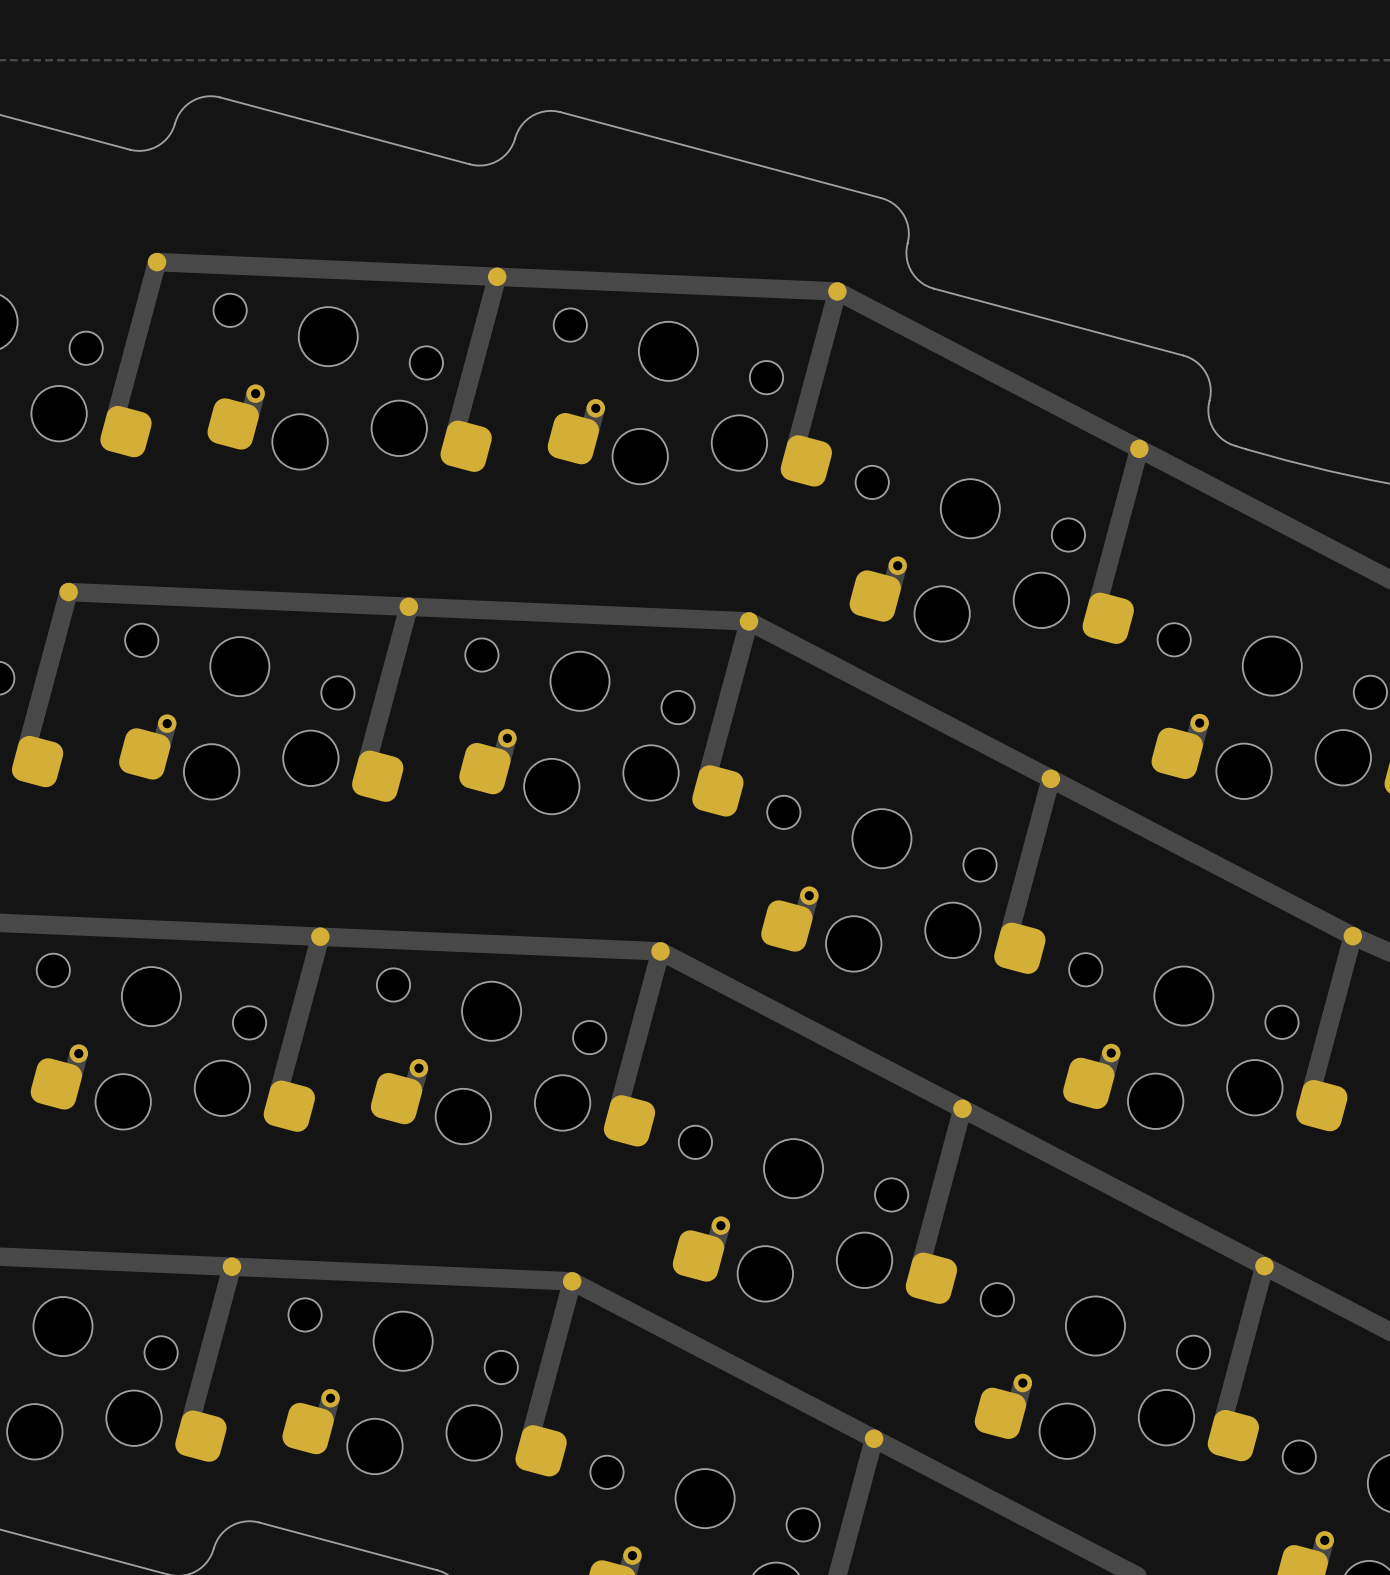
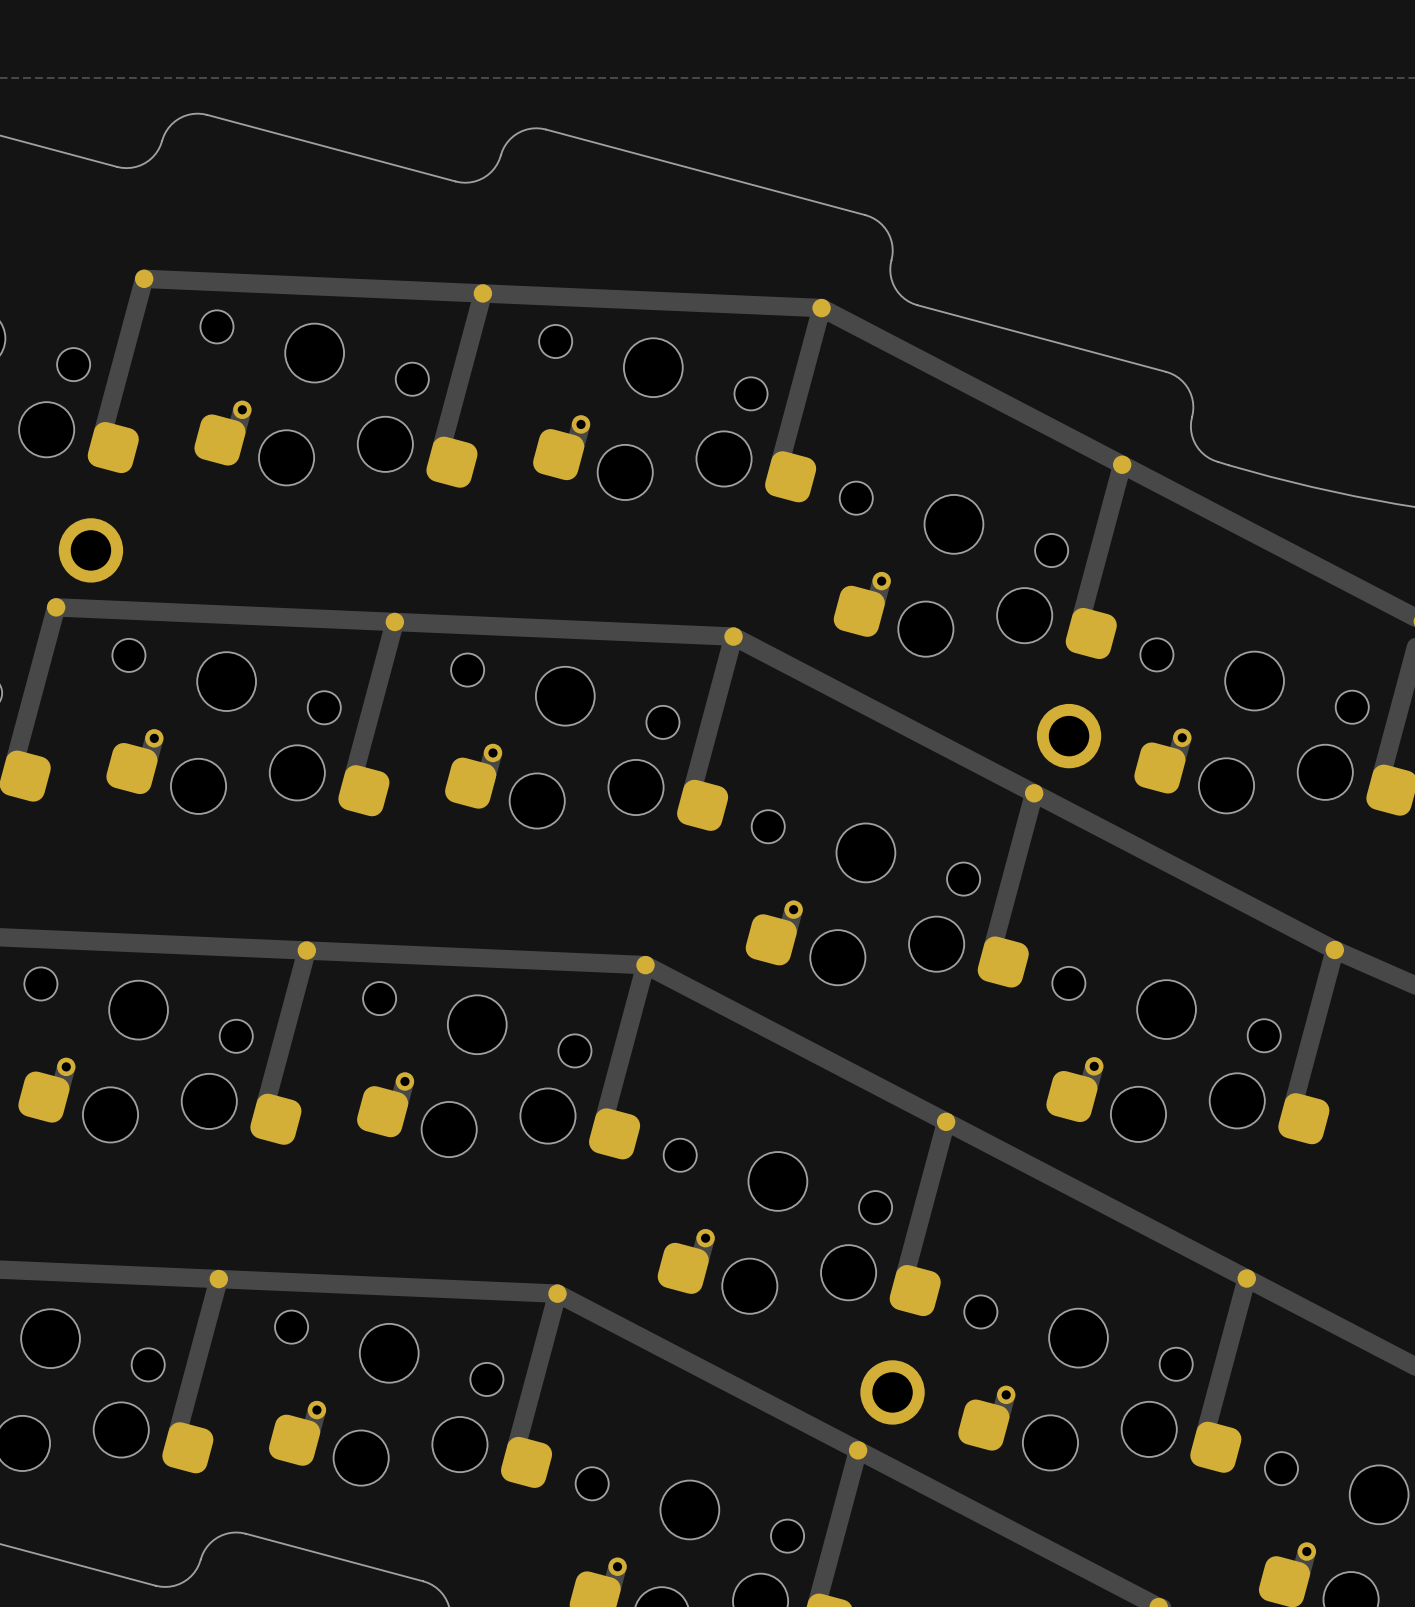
part: none -> (90, 550)
part: none -> (1069, 736)
part: none -> (892, 1392)

